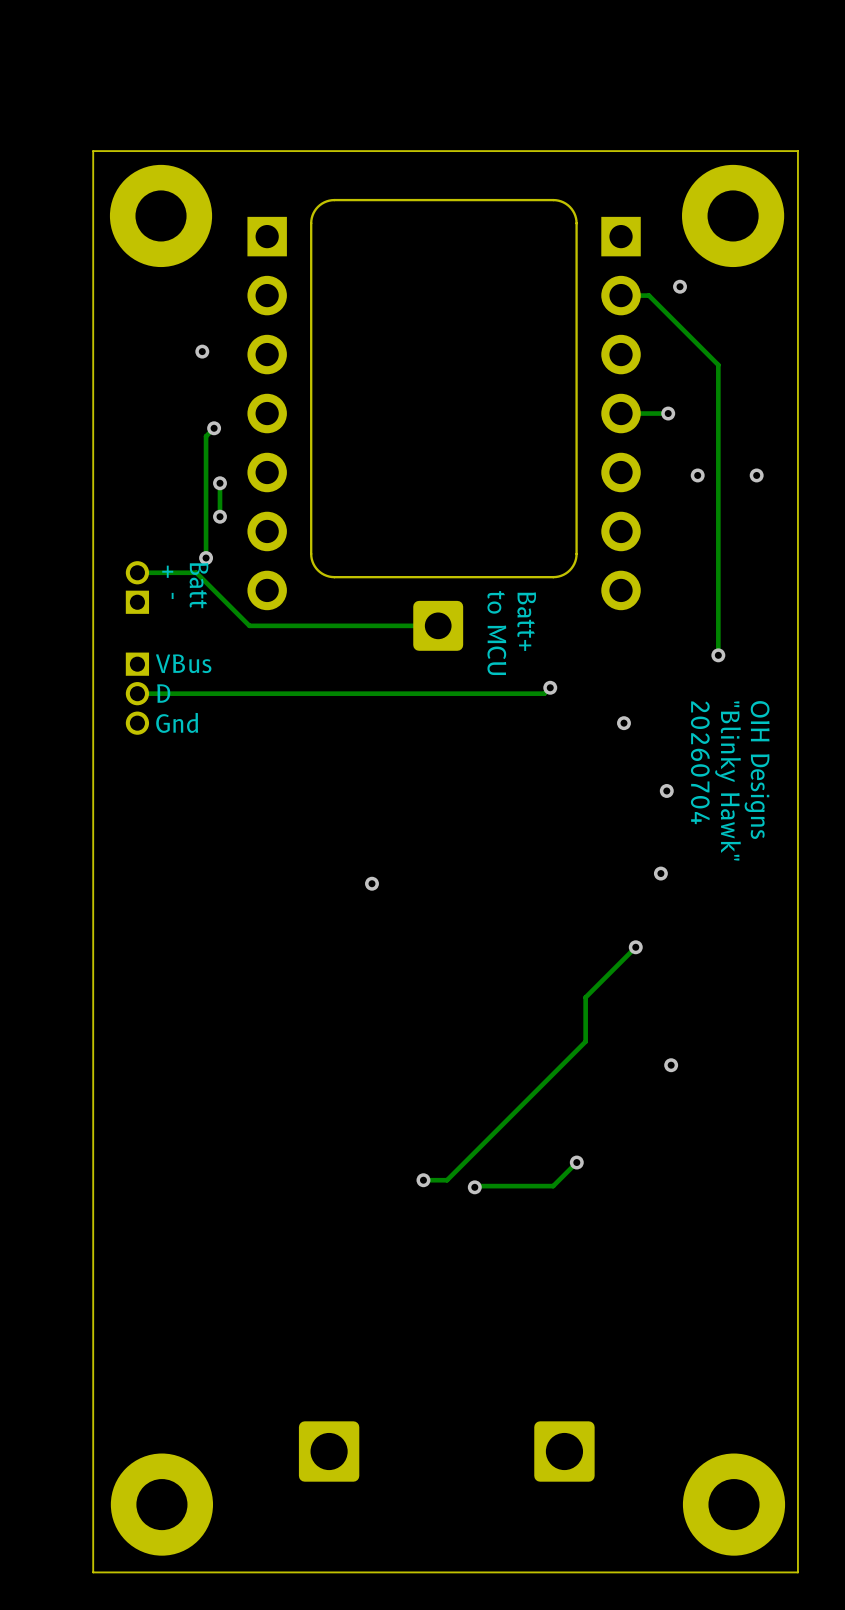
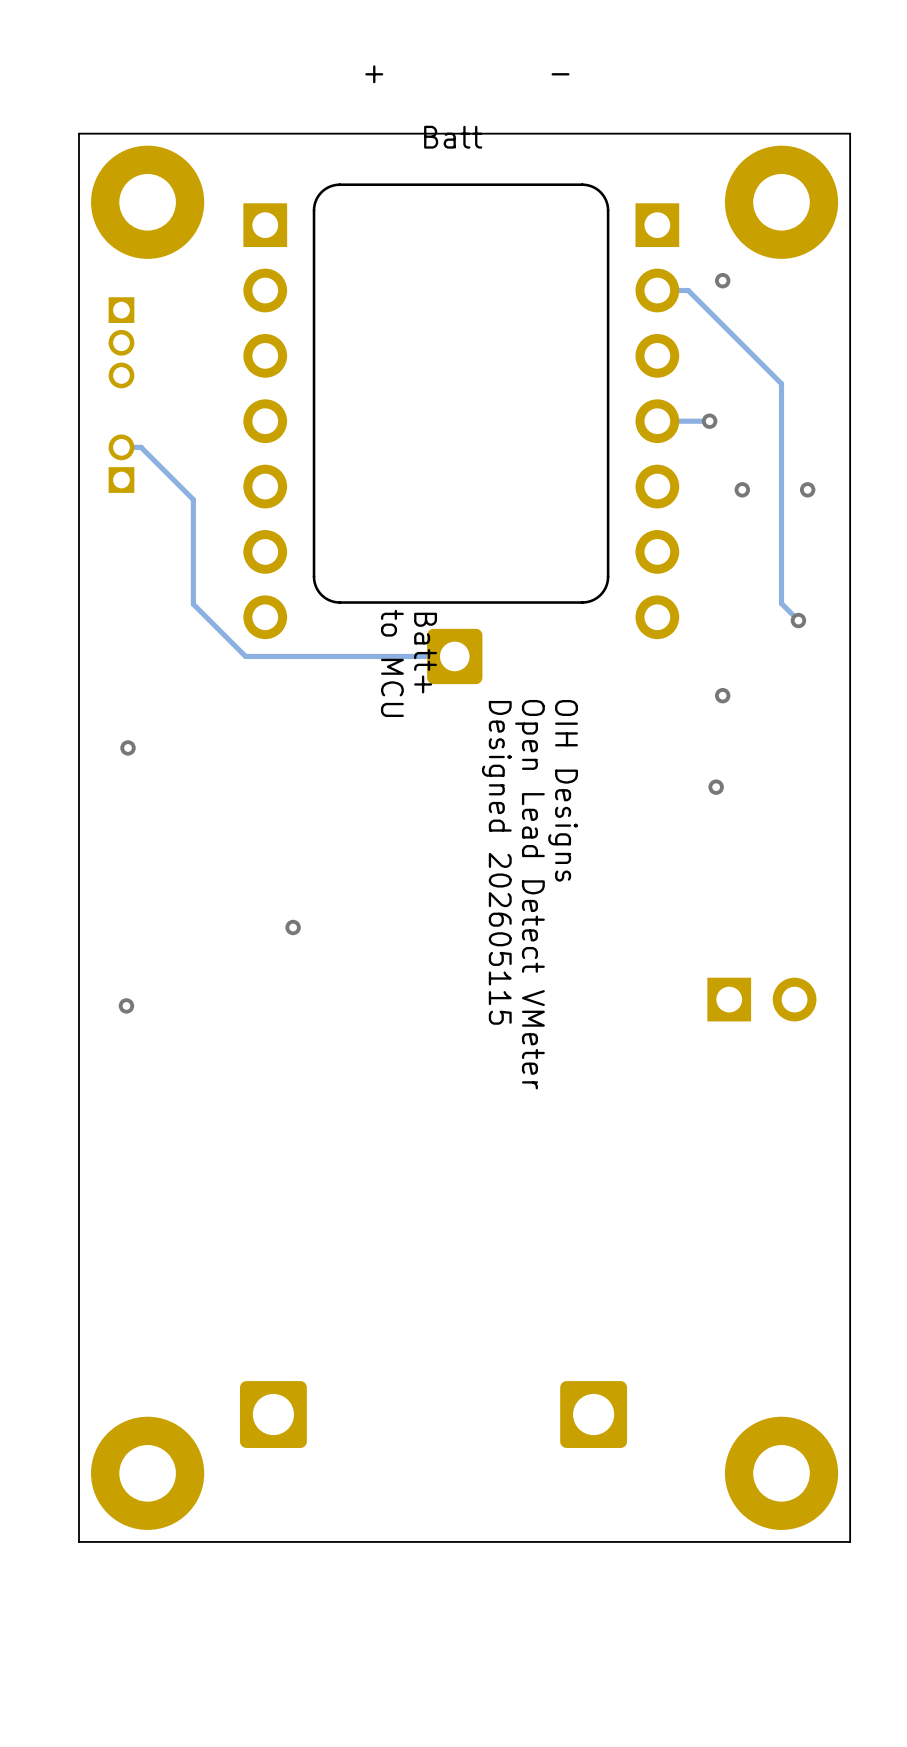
text: none -> - (560, 74)
board edge: (797, 151) (93, 151) (93, 1572) (797, 1572) (797, 151) -> (850, 133) (850, 1541) (79, 1541) (79, 133) (850, 133)
via: (202, 351) -> none
track: (718, 364) (718, 655) -> (765, 367) (781, 383) (781, 603) (798, 620)
track: (214, 428) (206, 436) (206, 558) -> none
via: (214, 428) -> none
track: (219, 483) (219, 516) -> none
via: (219, 483) -> none
via: (219, 516) -> none
via: (206, 558) -> none
text position: + (167, 571) -> + (374, 74)
track: (137, 572) (196, 572) (202, 578) -> (121, 447) (141, 447) (193, 499) (193, 604)
text rotation: 0° (198, 585) -> 90° counterclockwise (453, 137)
text position: Batt (198, 585) -> Batt (453, 137)
part position: (137, 587) -> (121, 463)
via: none -> (798, 620)
text: - (172, 595) -> none
text position: Batt+ (526, 621) -> Batt+ (425, 653)
text position: to MCU (496, 633) -> to MCU (392, 663)
via: (718, 655) -> none
via: none -> (722, 695)
text: VBus (183, 663) -> none
track: (550, 687) (544, 693) (137, 693) -> none
via: (550, 687) -> none
part position: (137, 693) -> (121, 342)
text: D (163, 693) -> none
via: none -> (128, 747)
text: Gnd (177, 722) -> none
via: (623, 723) -> none
via: none -> (716, 787)
text: 20260704 (700, 762) -> none
text position: OIH Designs (757, 770) -> OIH Designs (563, 790)
text: "Blinky Hawk" (728, 780) -> none
text: none -> Designed 202605115 (496, 862)
via: (666, 790) -> none
text: none -> Open Lead Detect VMeter (529, 894)
via: (660, 873) -> none
via position: (371, 883) -> (293, 927)
part: none -> (761, 999)
via: none -> (126, 1005)
track: (635, 947) (585, 997) (585, 1041) (447, 1180) (423, 1180) -> none
via: (635, 947) -> none
via: (671, 1065) -> none
track: (576, 1162) (553, 1186) (474, 1187) -> none
via: (576, 1162) -> none
via: (423, 1180) -> none
via: (474, 1187) -> none
part: none -> (273, 1414)
part: none -> (593, 1414)
part: (329, 1451) -> none
part: (564, 1451) -> none
part position: (161, 1504) -> (147, 1473)
part position: (734, 1504) -> (781, 1473)

